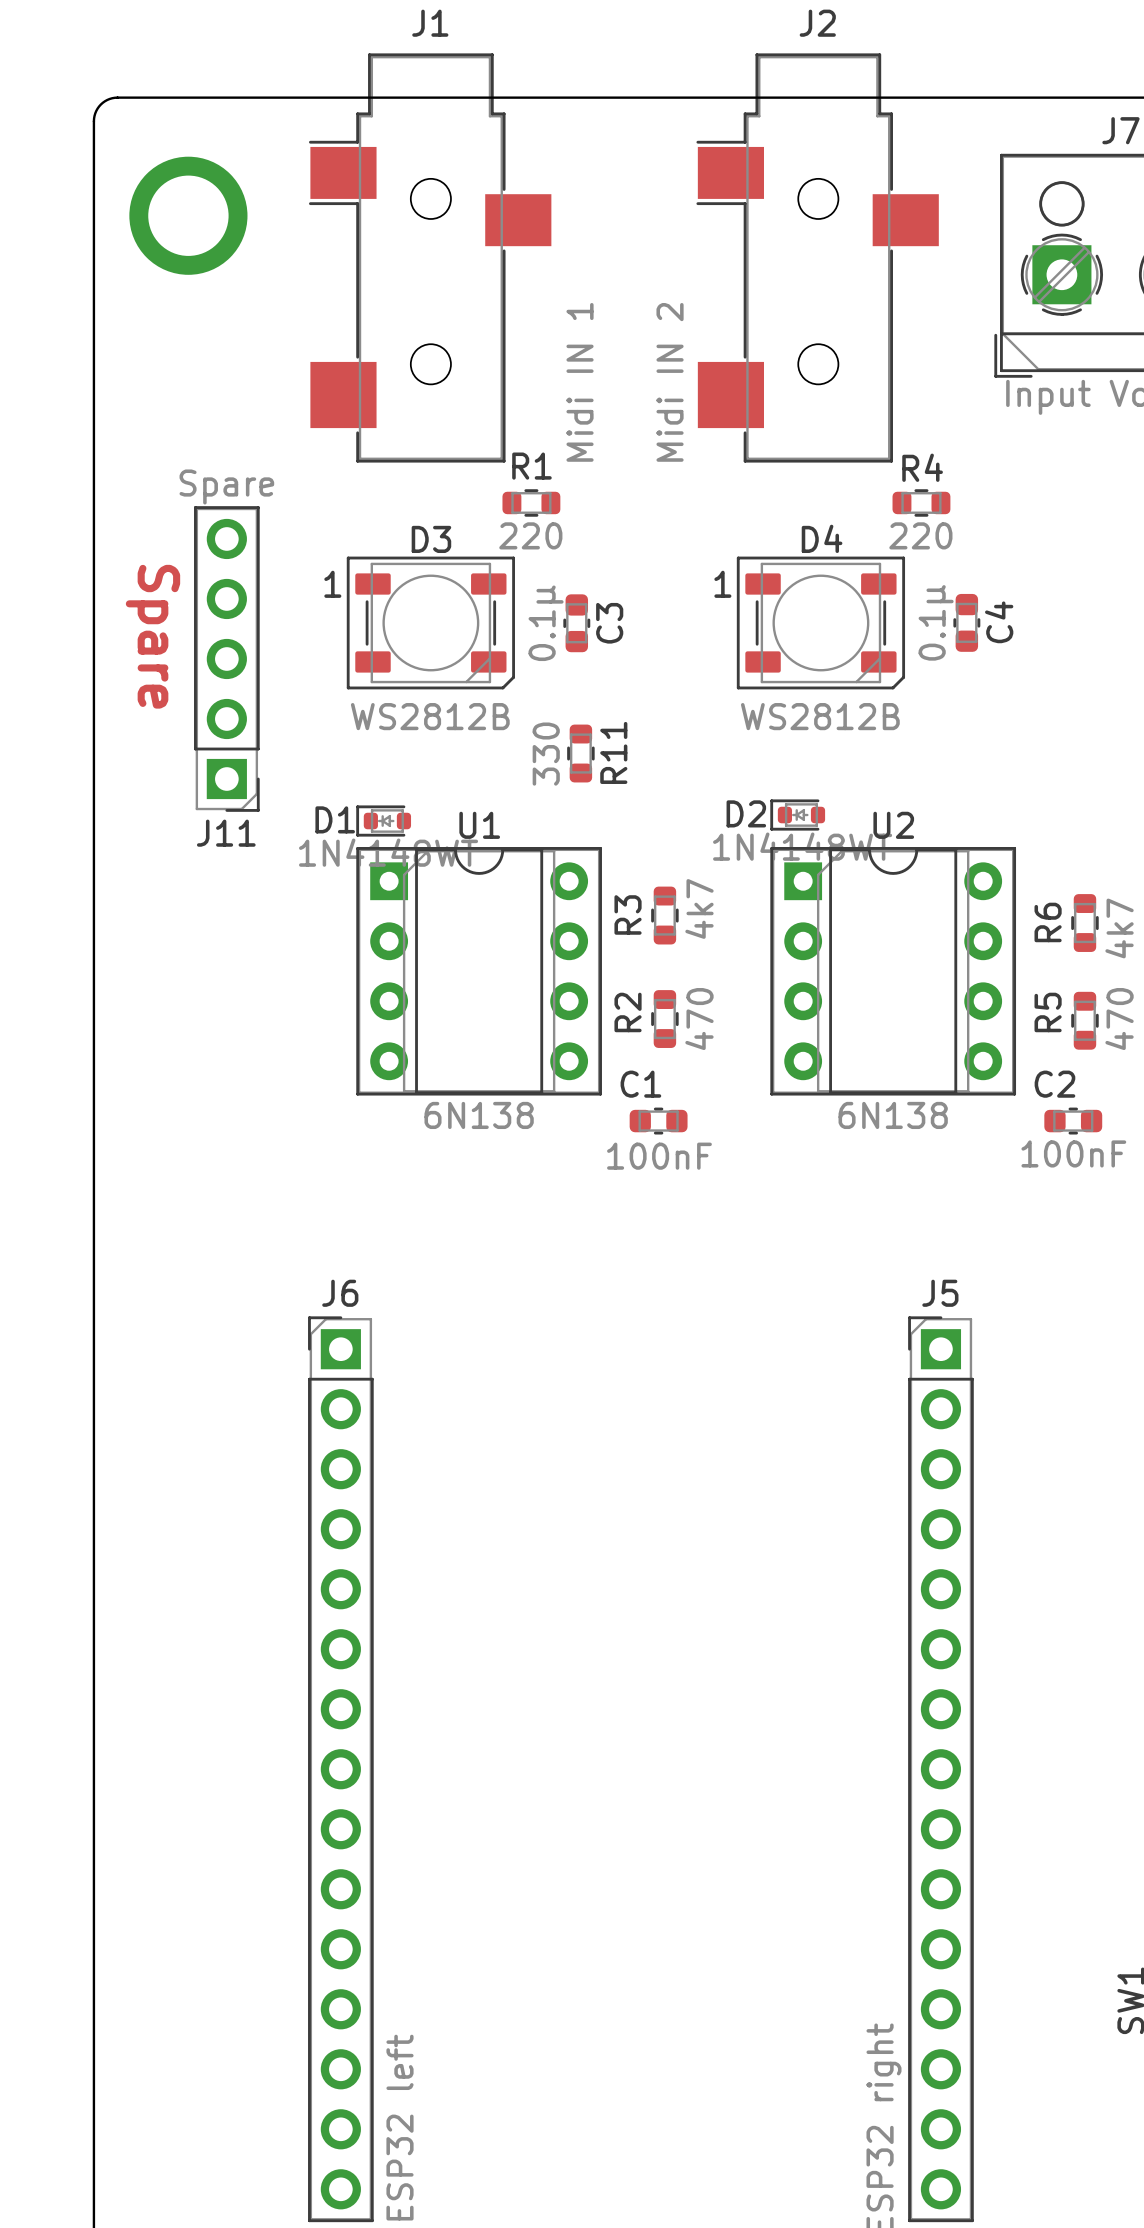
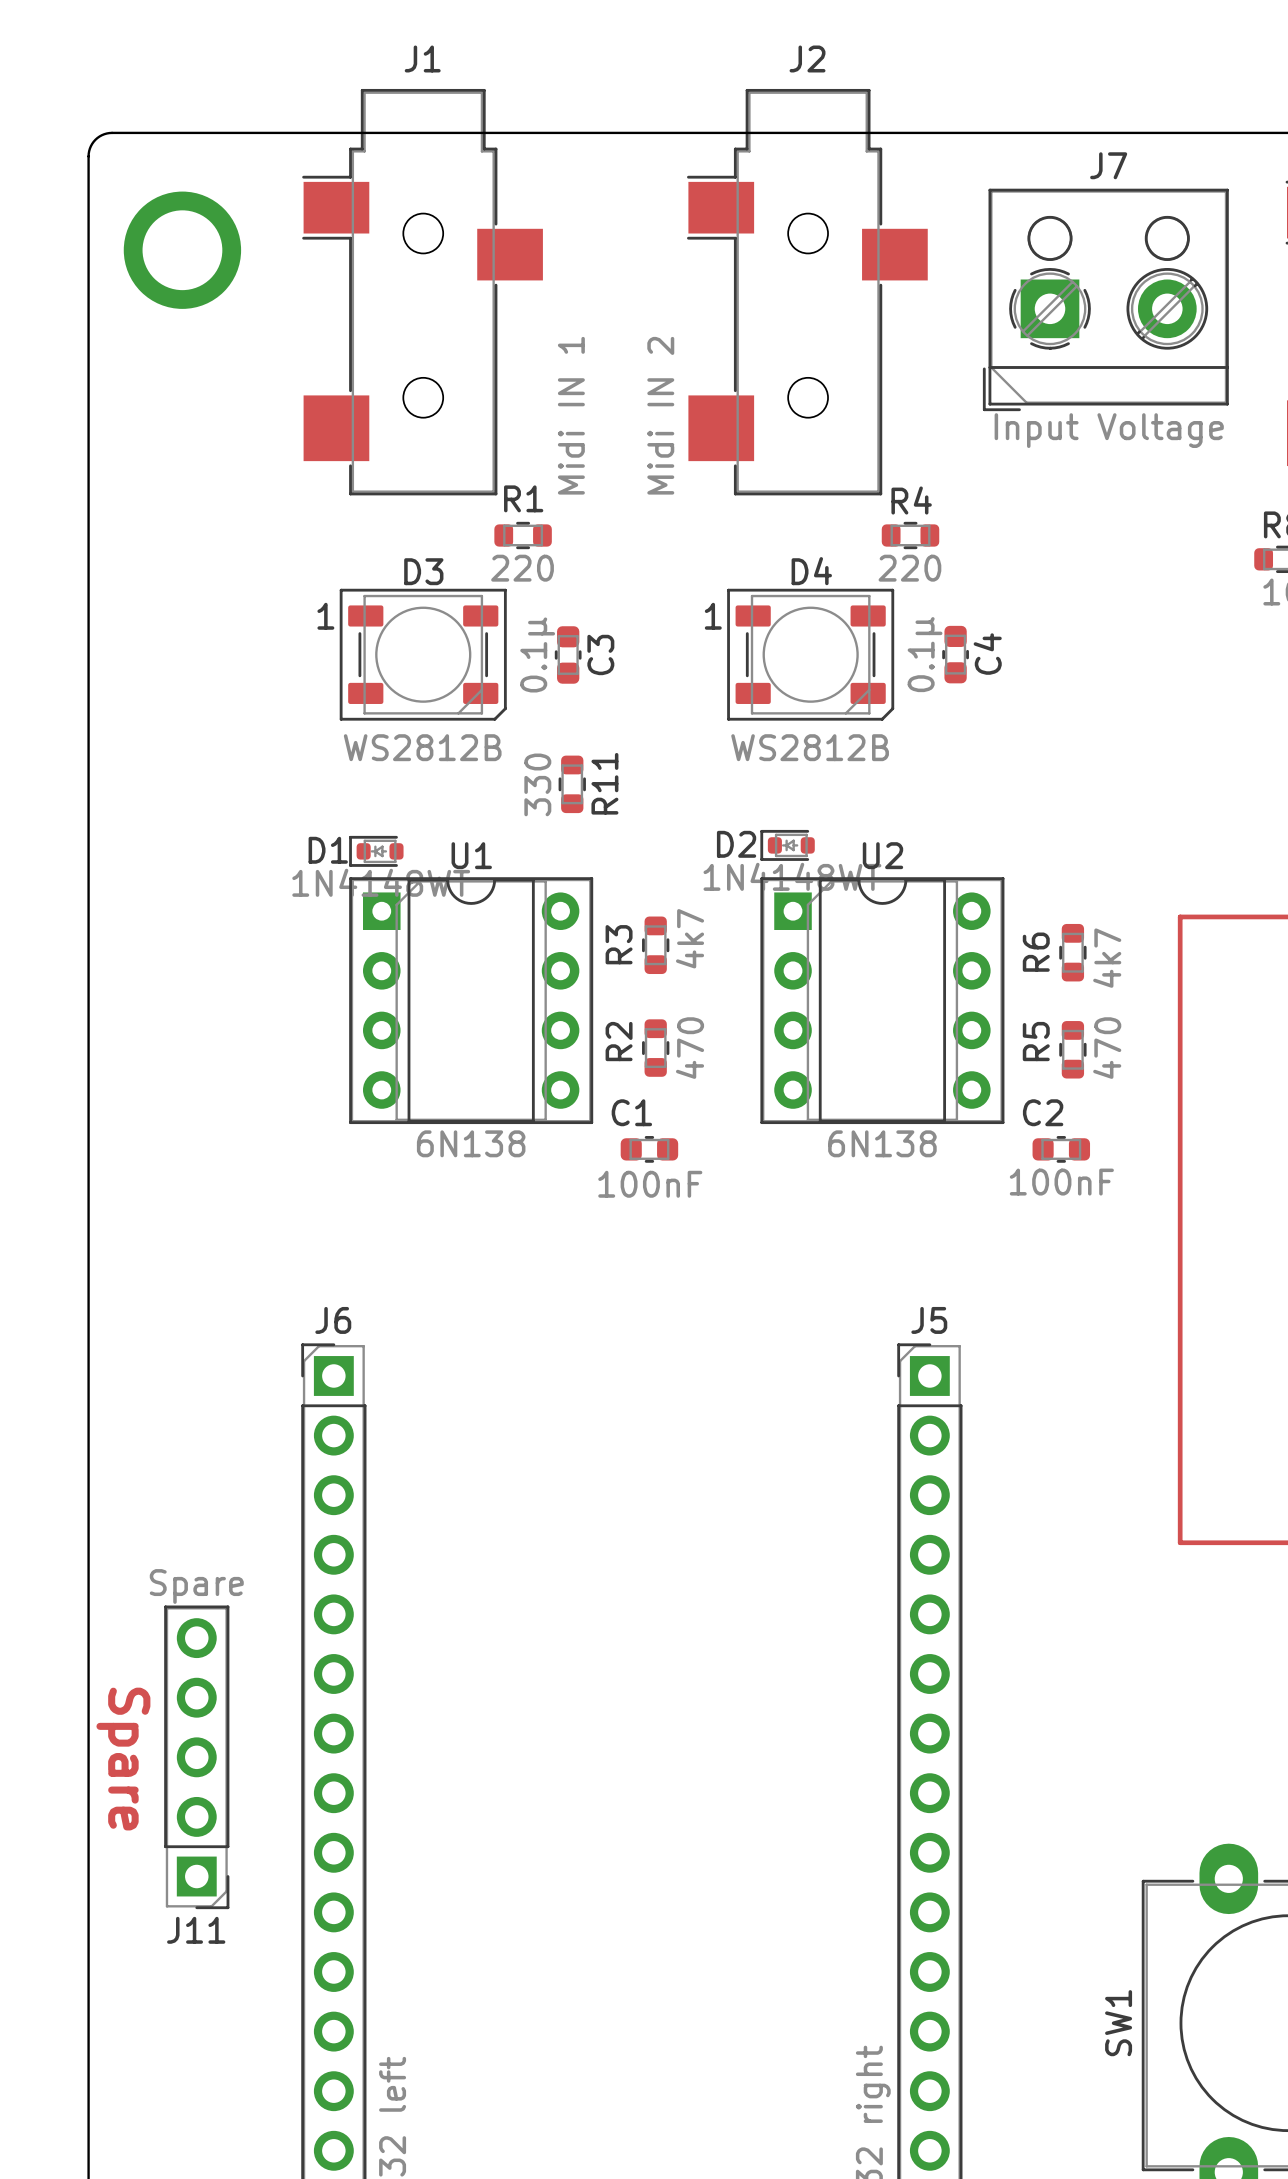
text: Spare (152, 636) -> none
J11 position: (226, 658) -> (196, 1757)
text: none -> Spare (123, 1759)

